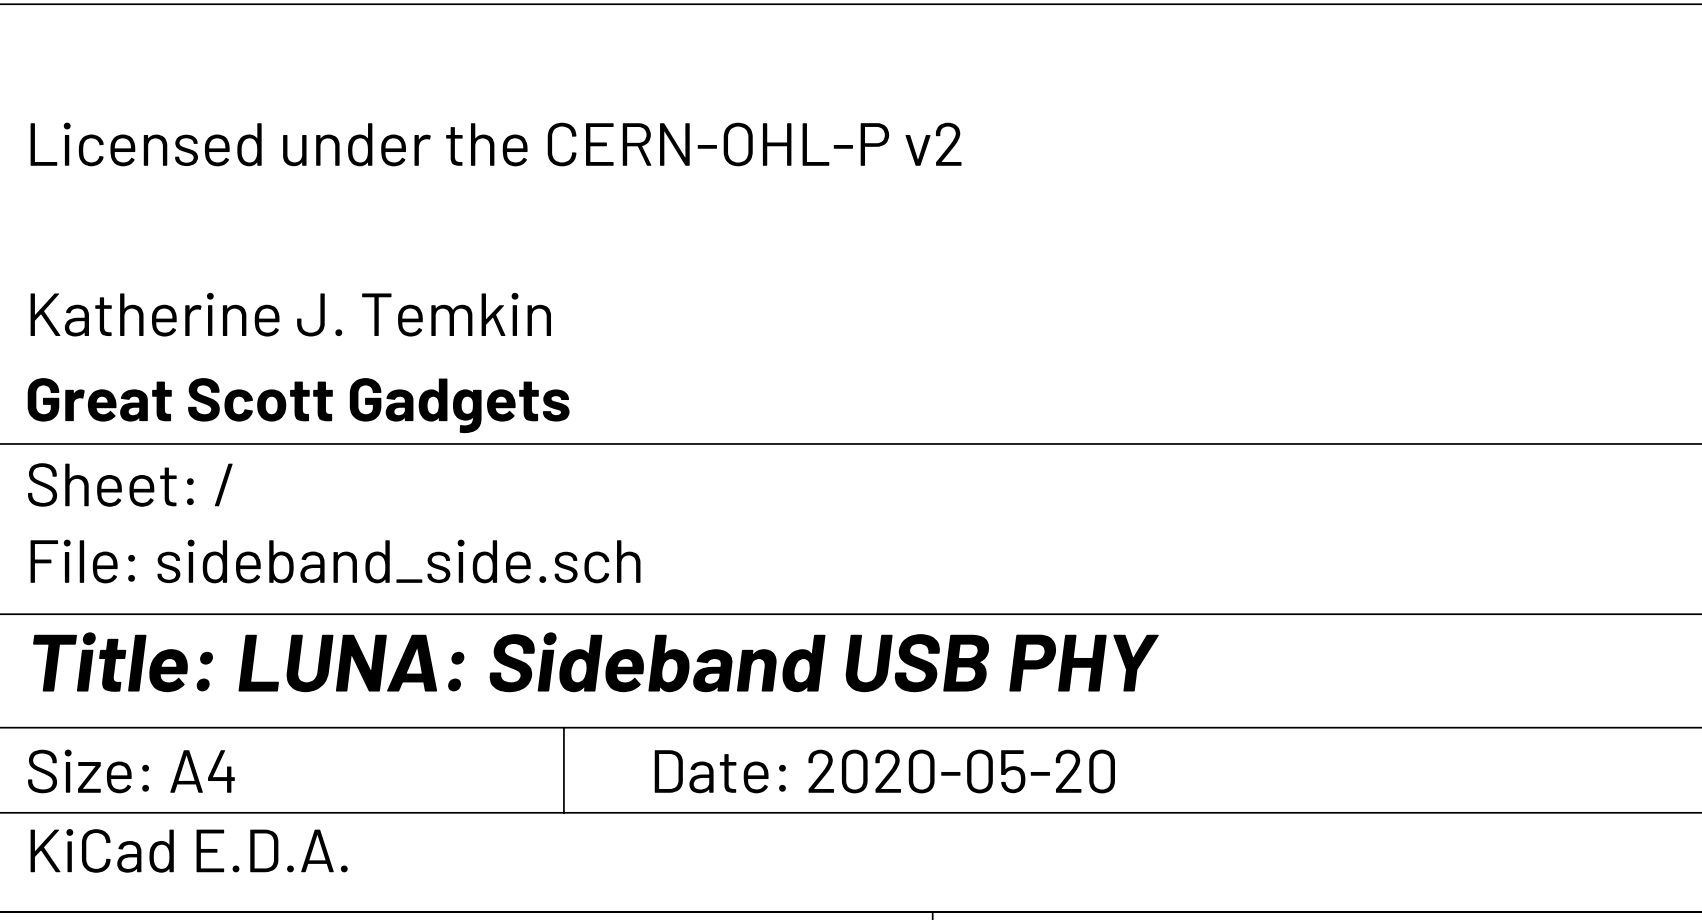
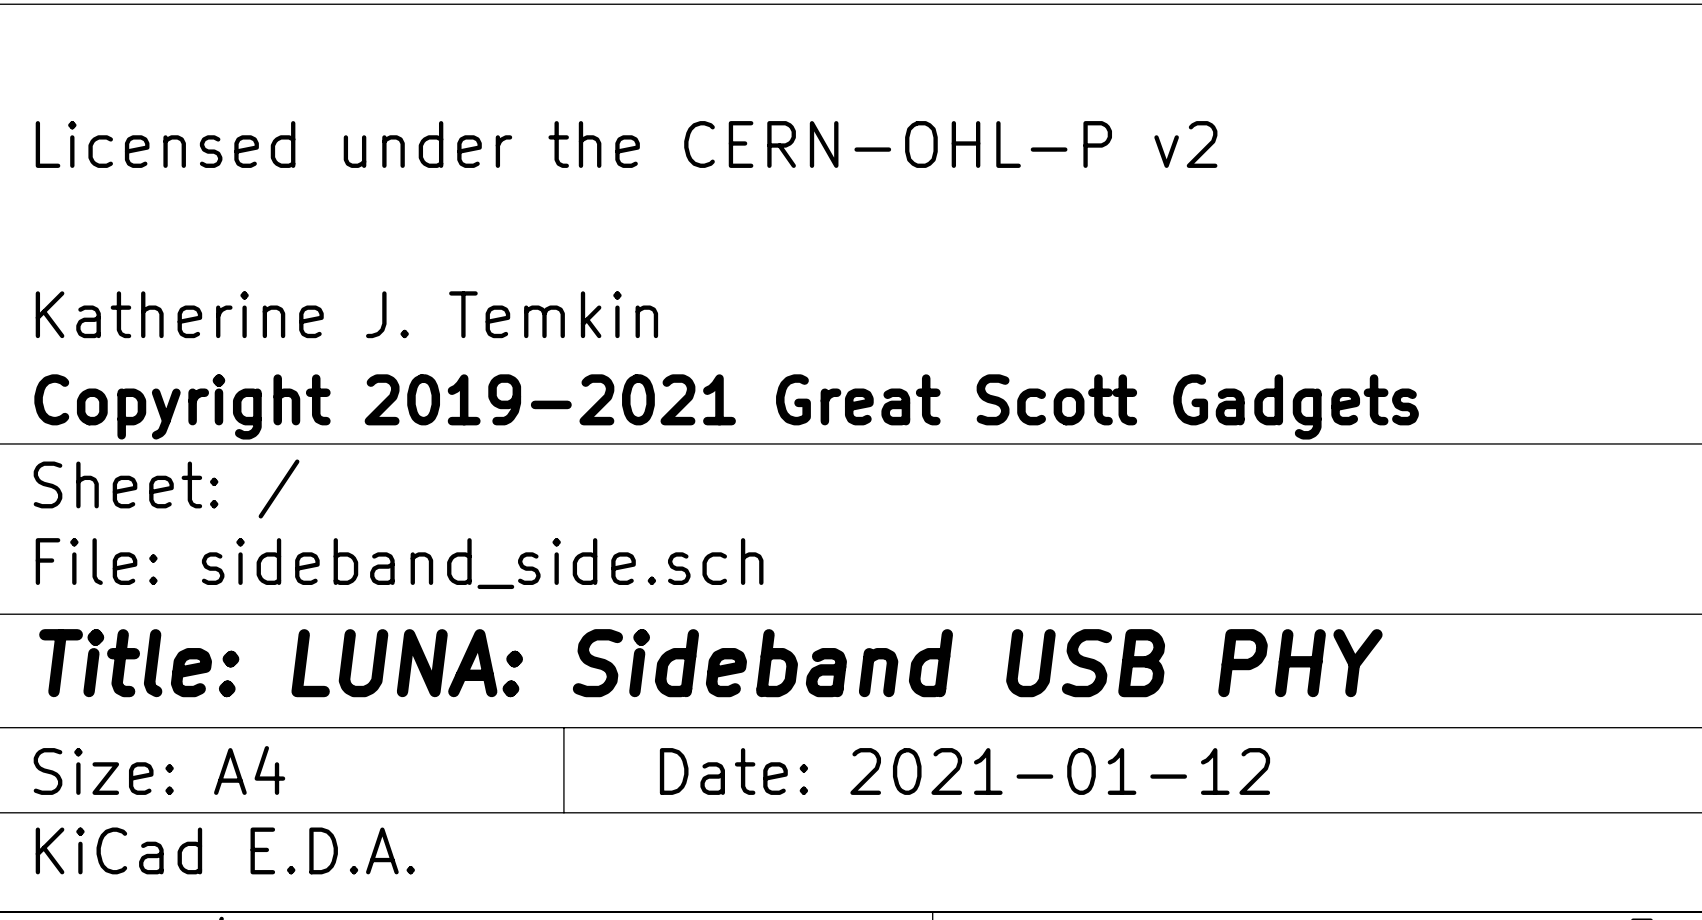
title block: Great Scott Gadgets (298, 405) -> Copyright 2019-2021 Great Scott Gadgets (726, 406)
title block: Date: 2020-05-20 (884, 771) -> Date: 2021-01-12 (964, 771)

